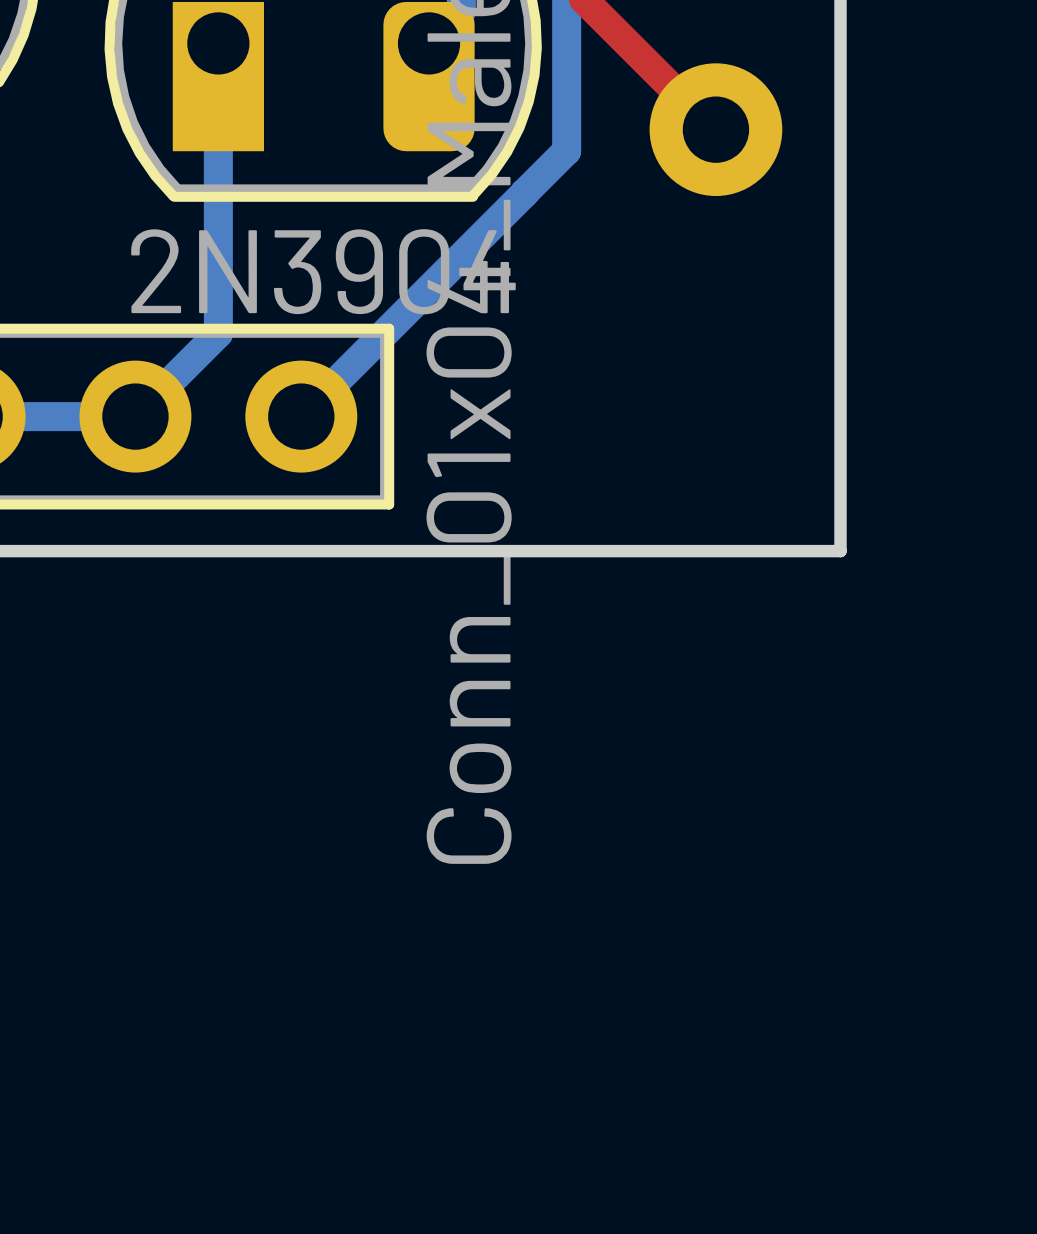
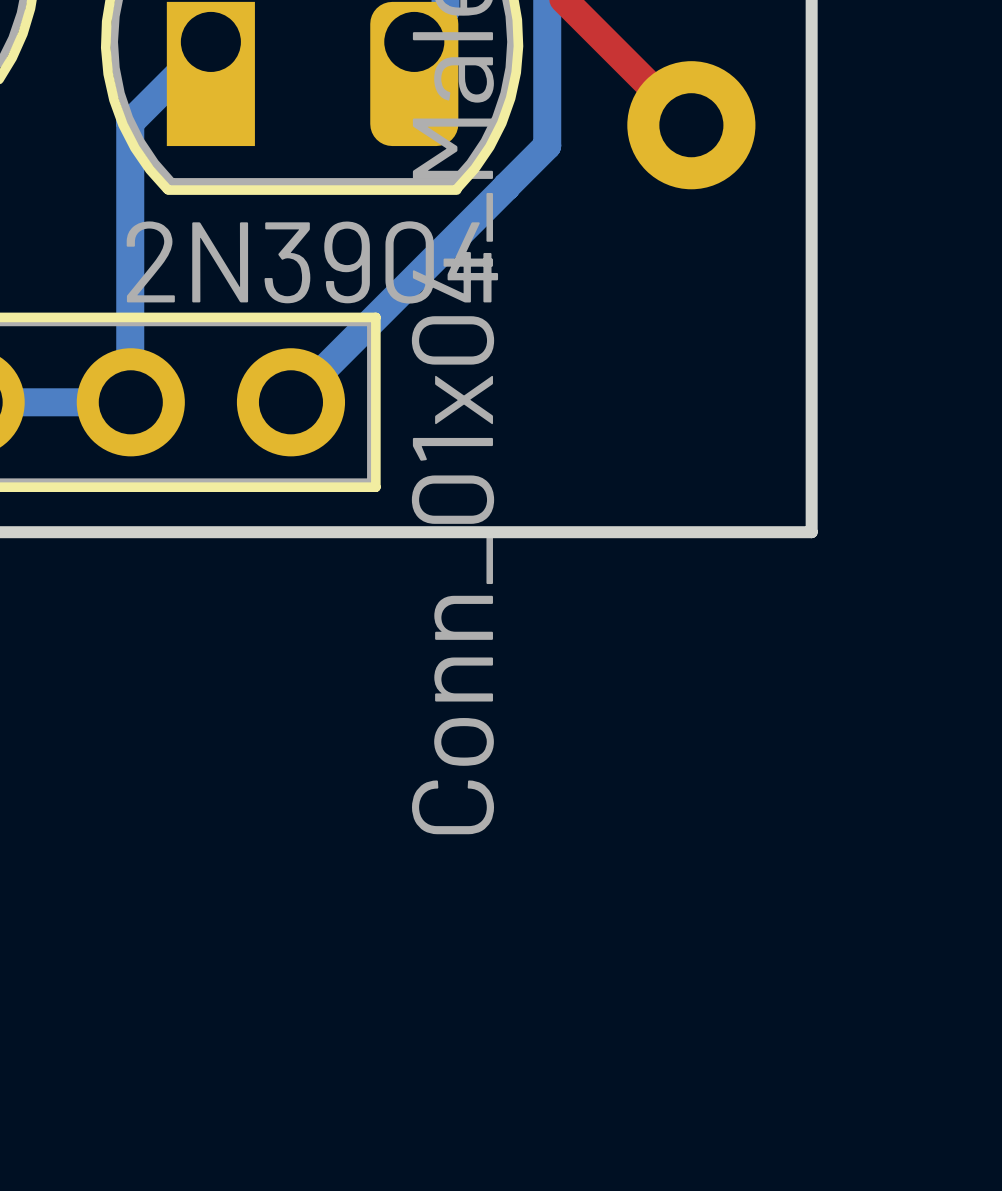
bottom track: (218, 43) (218, 333) (135, 416) -> (210, 41) (130, 122) (130, 401)

